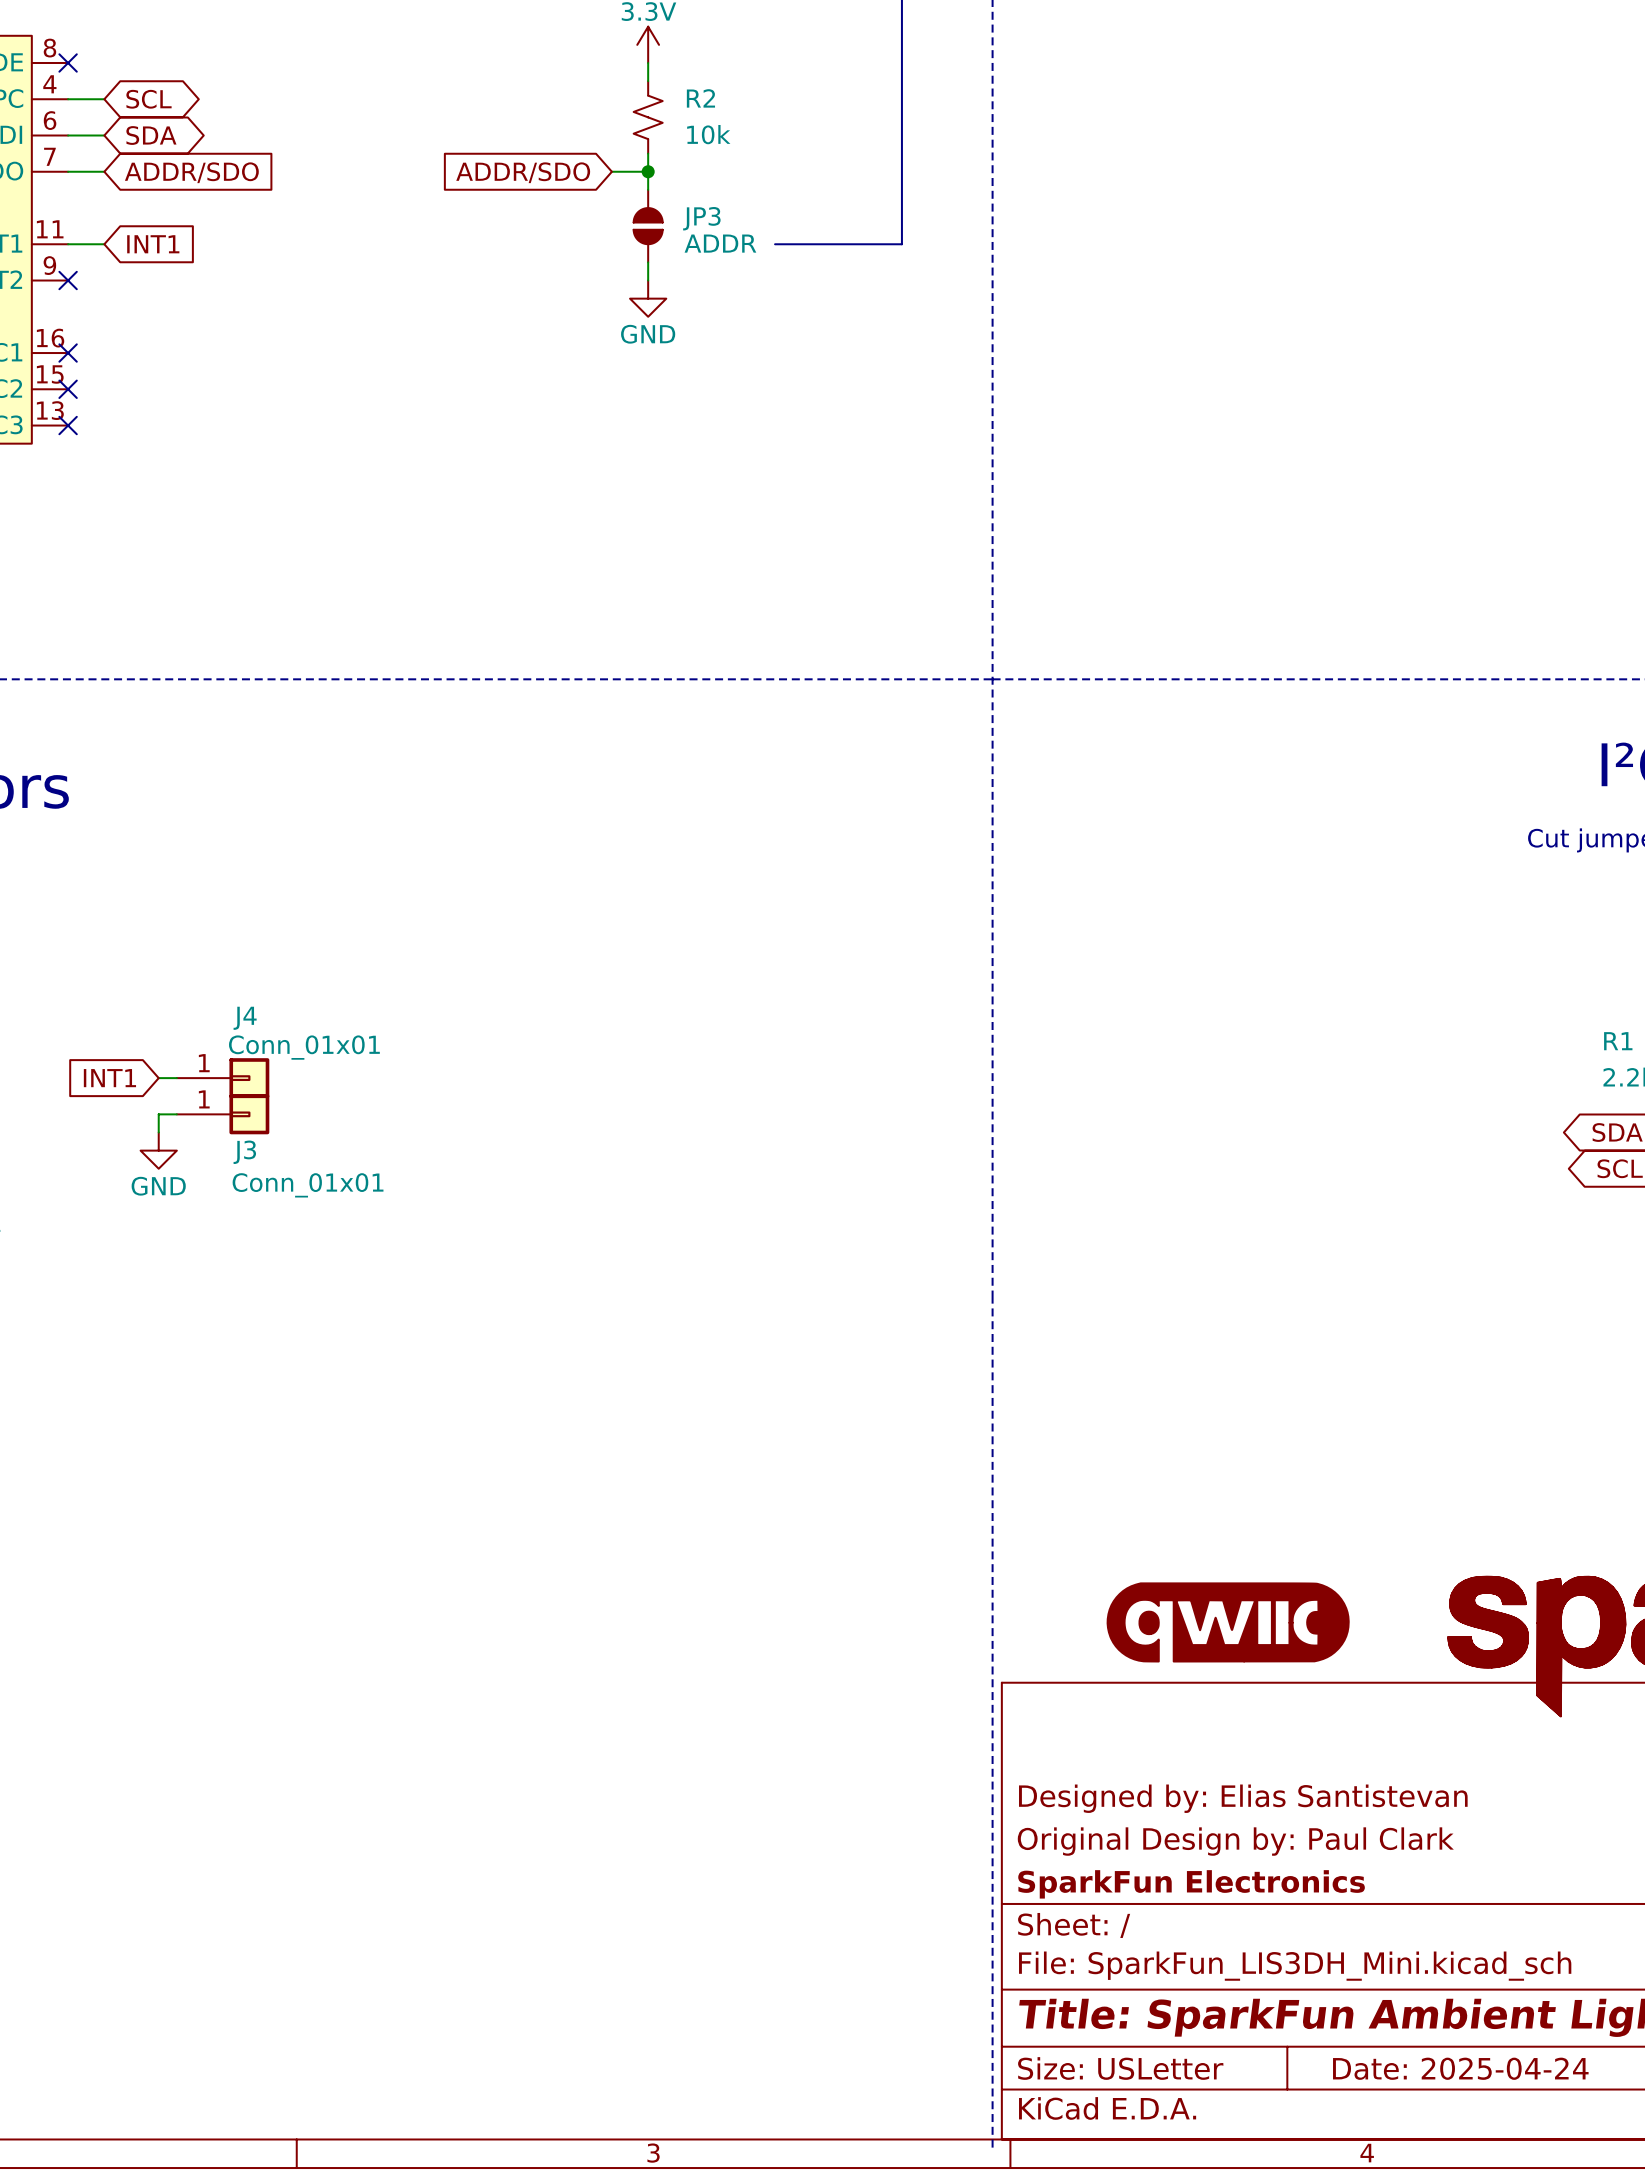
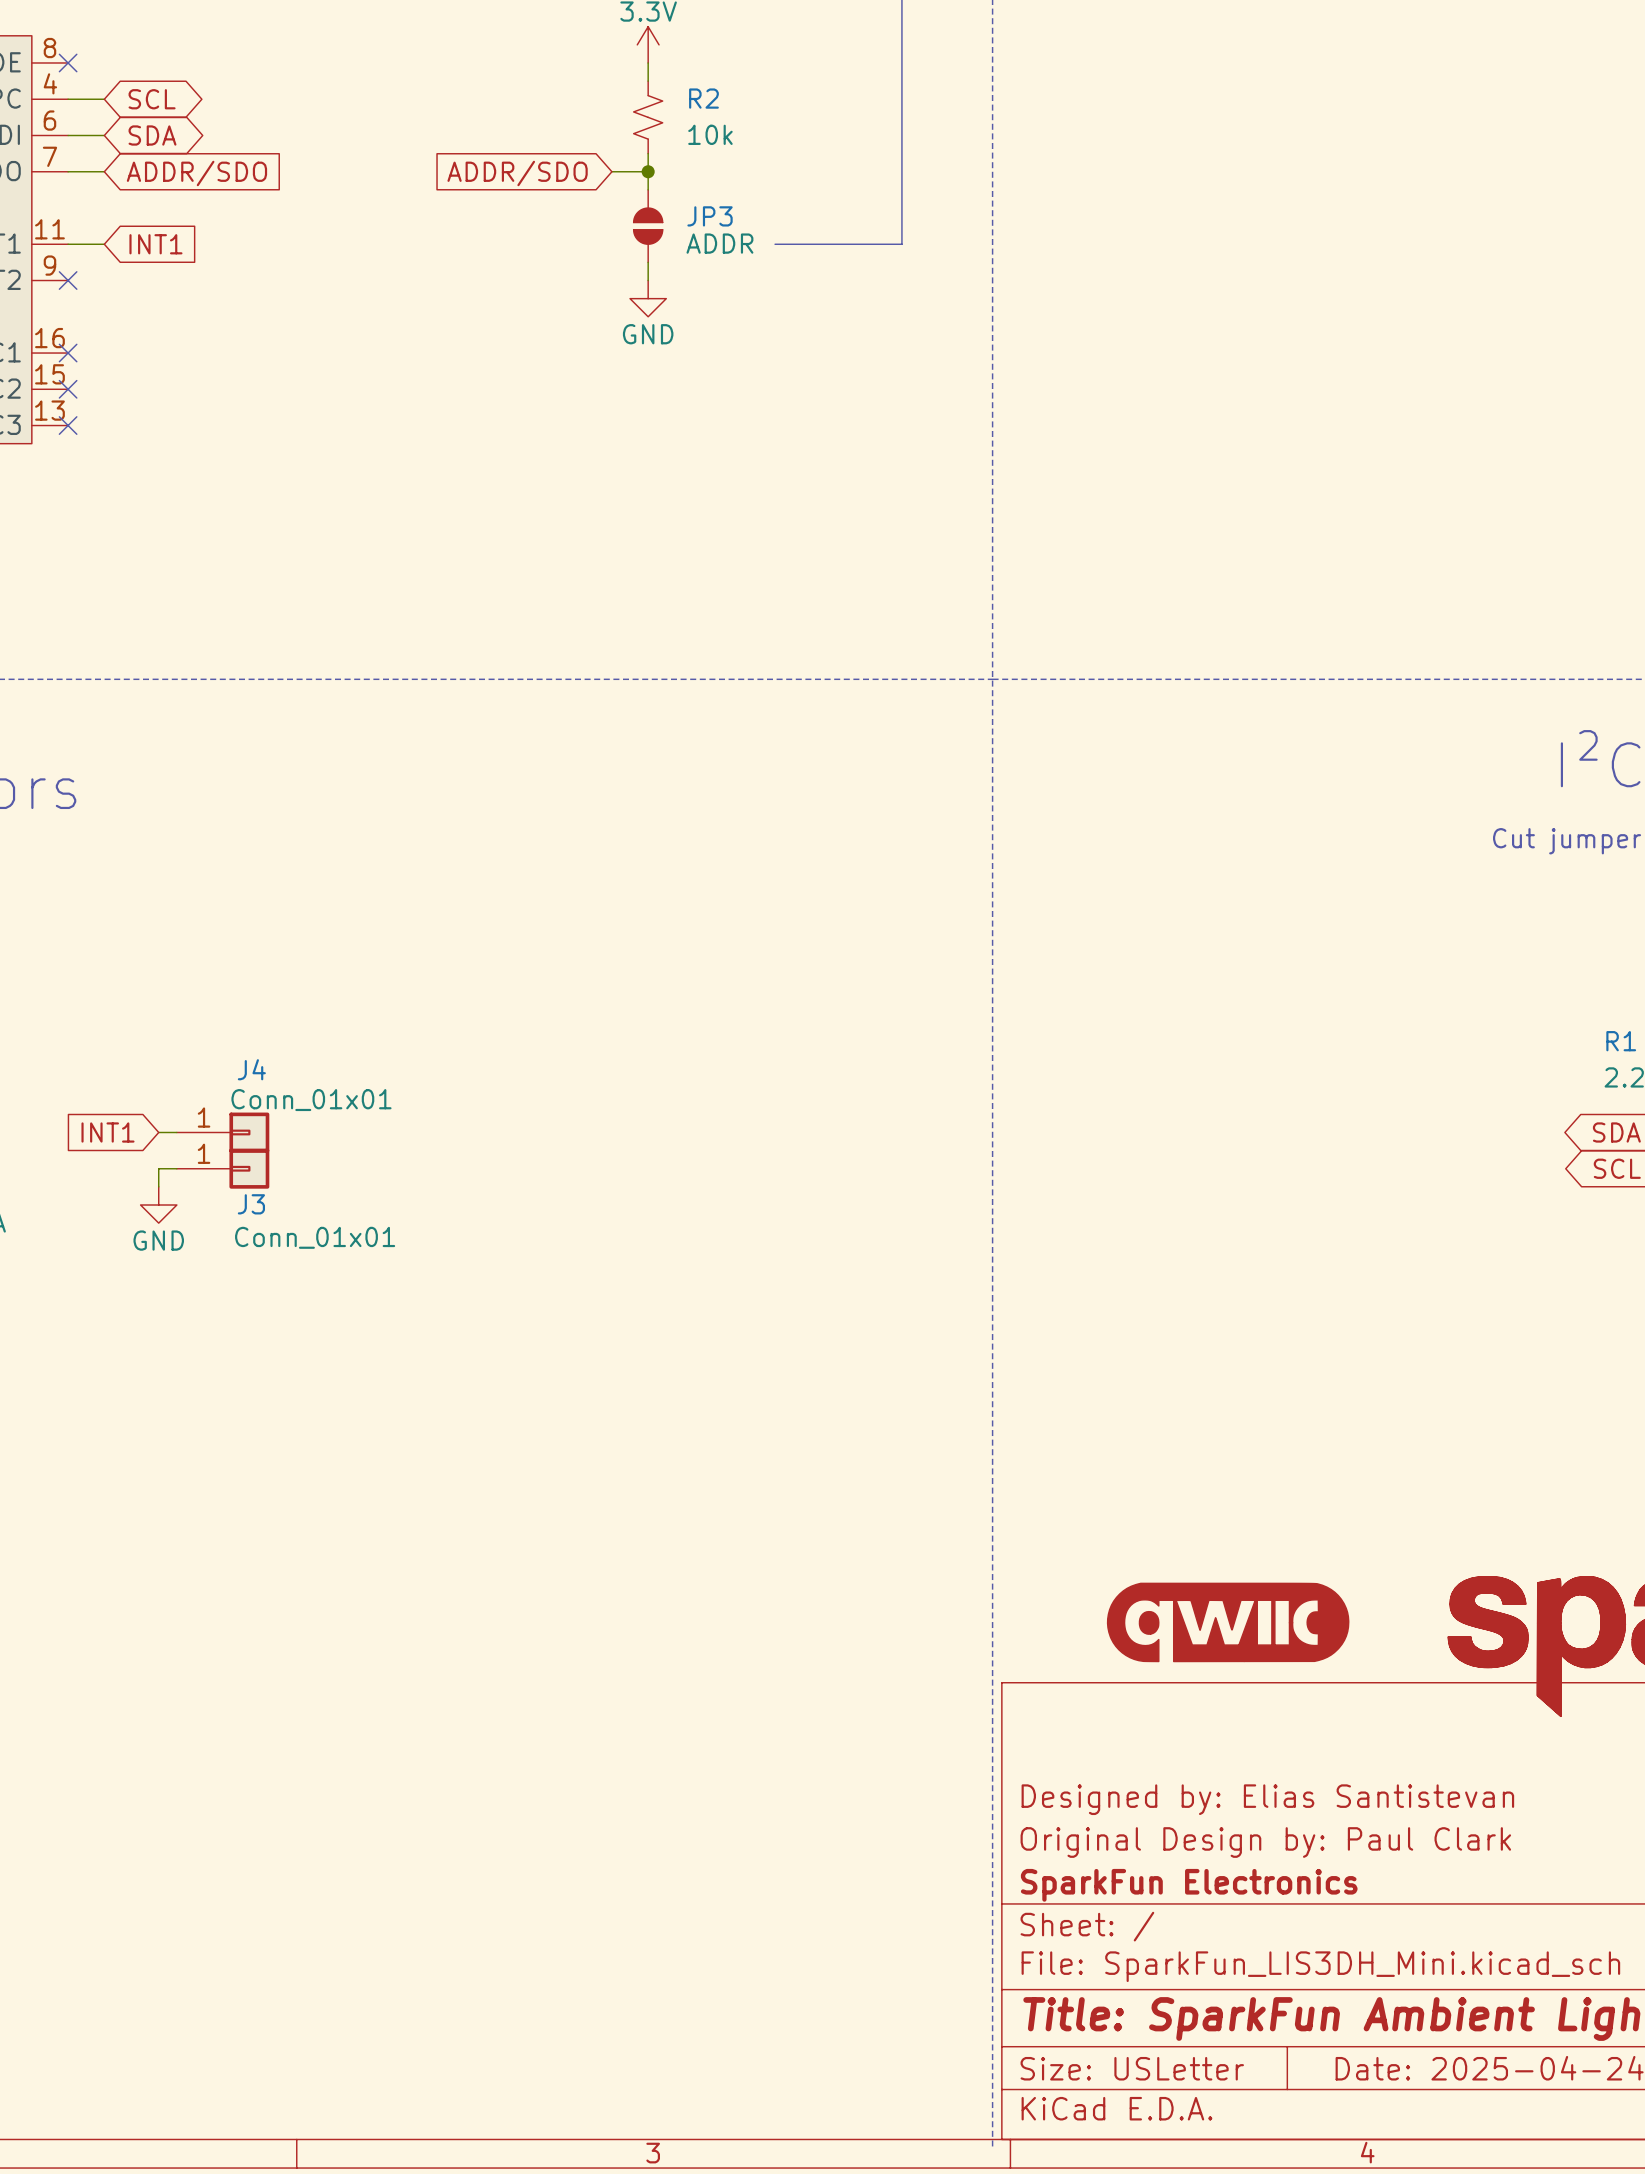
global label position: INT1 (109, 1078) -> INT1 (107, 1132)
wire: (158, 1078) (176, 1078) -> none
J4 position: (223, 1078) -> (223, 1132)
wire: (176, 1114) (158, 1114) (158, 1132) -> (176, 1132) (158, 1132)
J3 position: (223, 1114) -> (223, 1168)
power symbol position: GND (158, 1150) -> GND (158, 1205)
wire: none -> (176, 1168) (158, 1168) (158, 1186)

